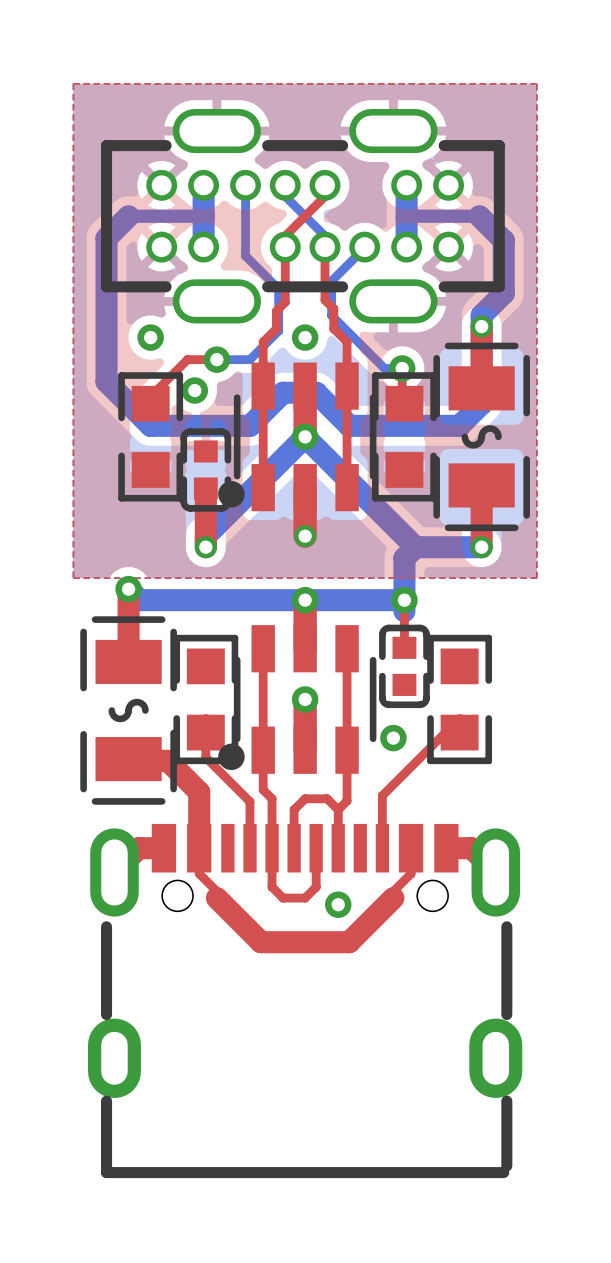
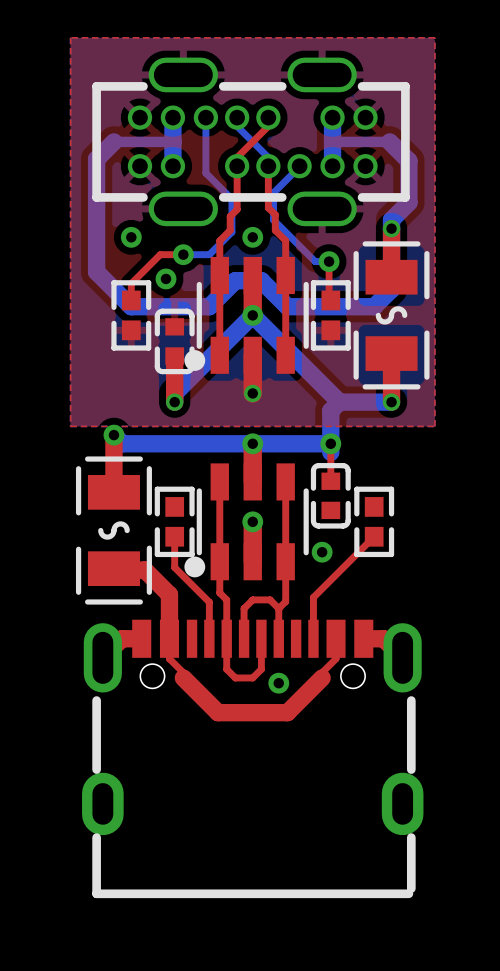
part footprint: [118, 372, 184, 502] -> [111, 280, 152, 351]
part footprint: [372, 372, 437, 502] -> [310, 280, 351, 351]
part footprint: [173, 634, 239, 765] -> [154, 486, 195, 558]
part footprint: [427, 634, 493, 765] -> [354, 486, 395, 558]

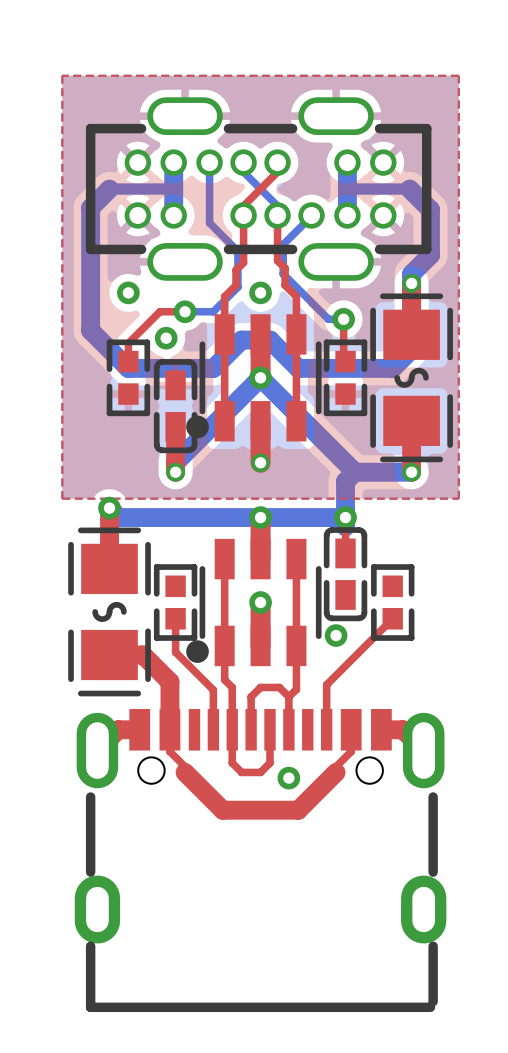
part footprint: [353, 241, 430, 390] -> [370, 293, 453, 463]
part footprint: [154, 308, 195, 375] -> [153, 359, 198, 454]
part footprint: [75, 456, 152, 605] -> [68, 527, 151, 697]
part footprint: [310, 463, 351, 529] -> [323, 527, 368, 622]

